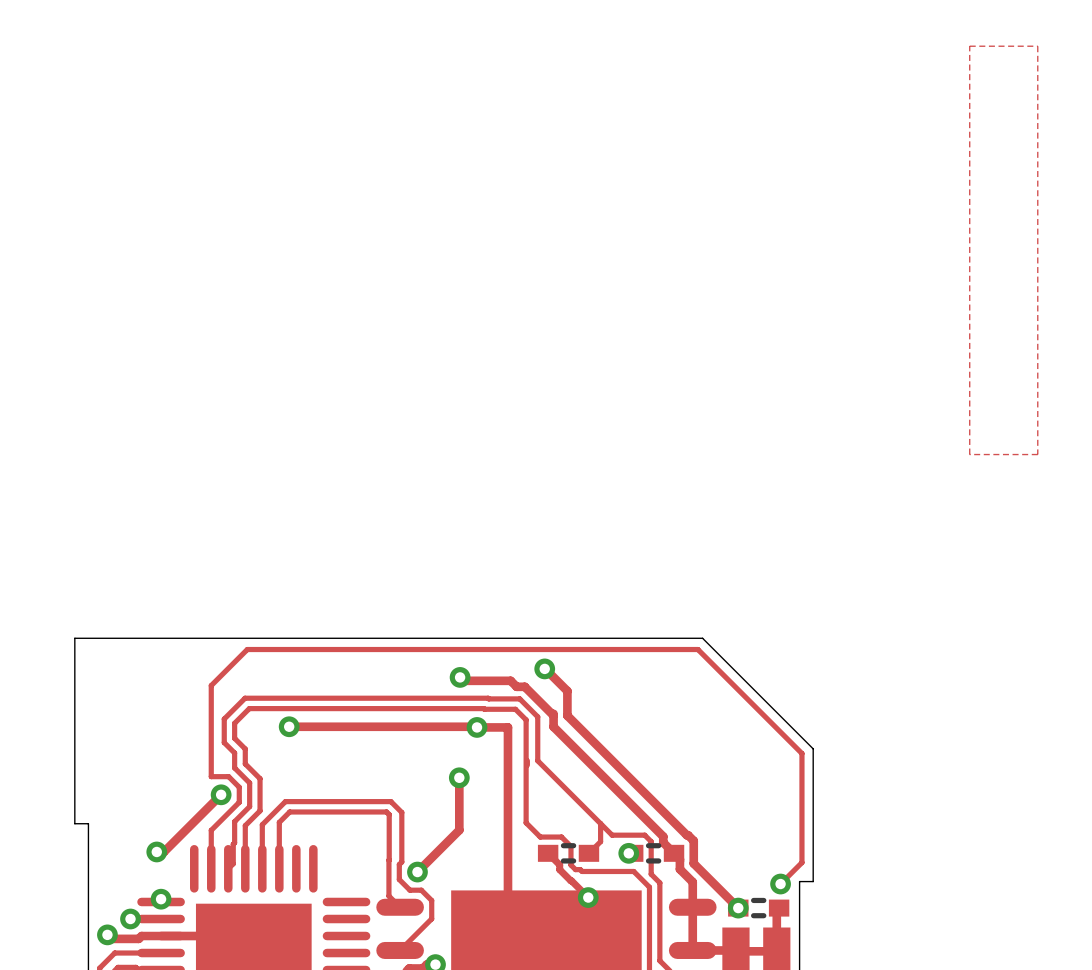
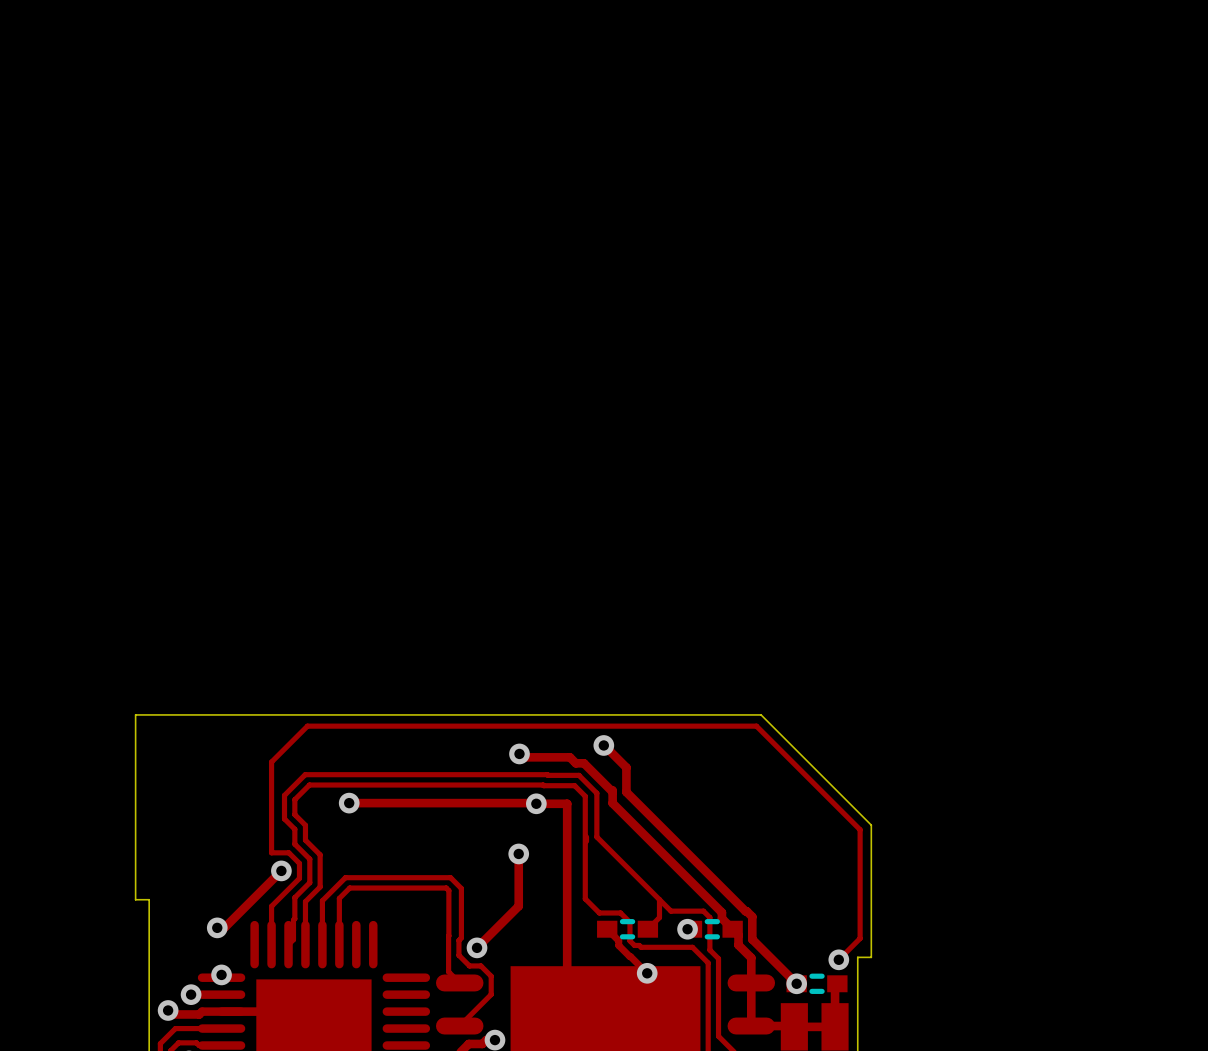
zone outline: (969, 46) (1037, 46) (1037, 454) (969, 454) (969, 46) -> none

